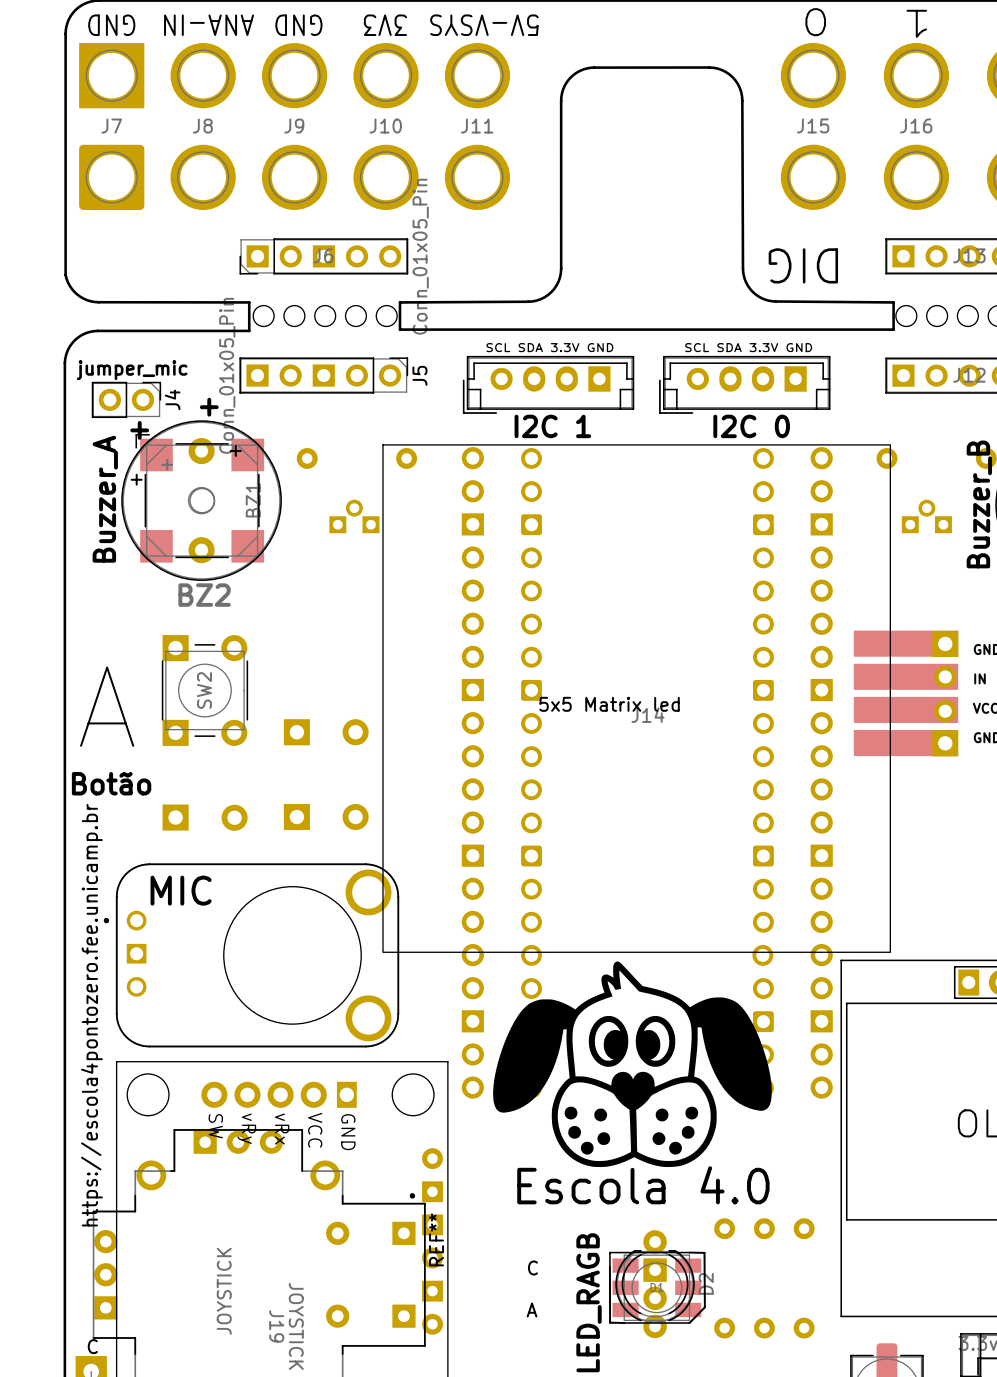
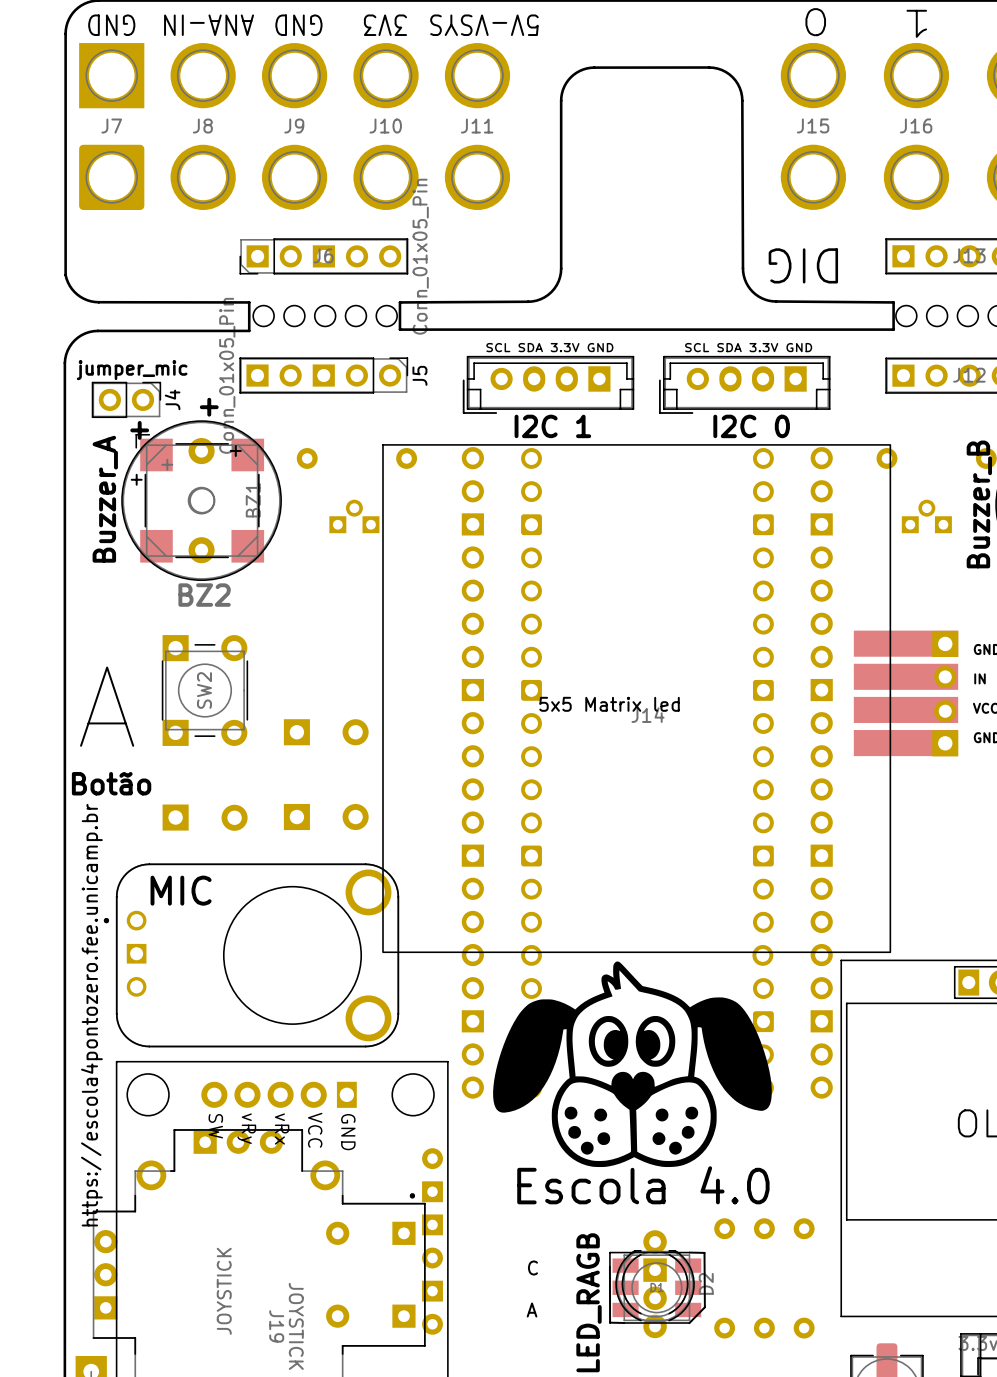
REF** name: REF** (436, 1239) -> none
text: C (92, 1346) -> none

